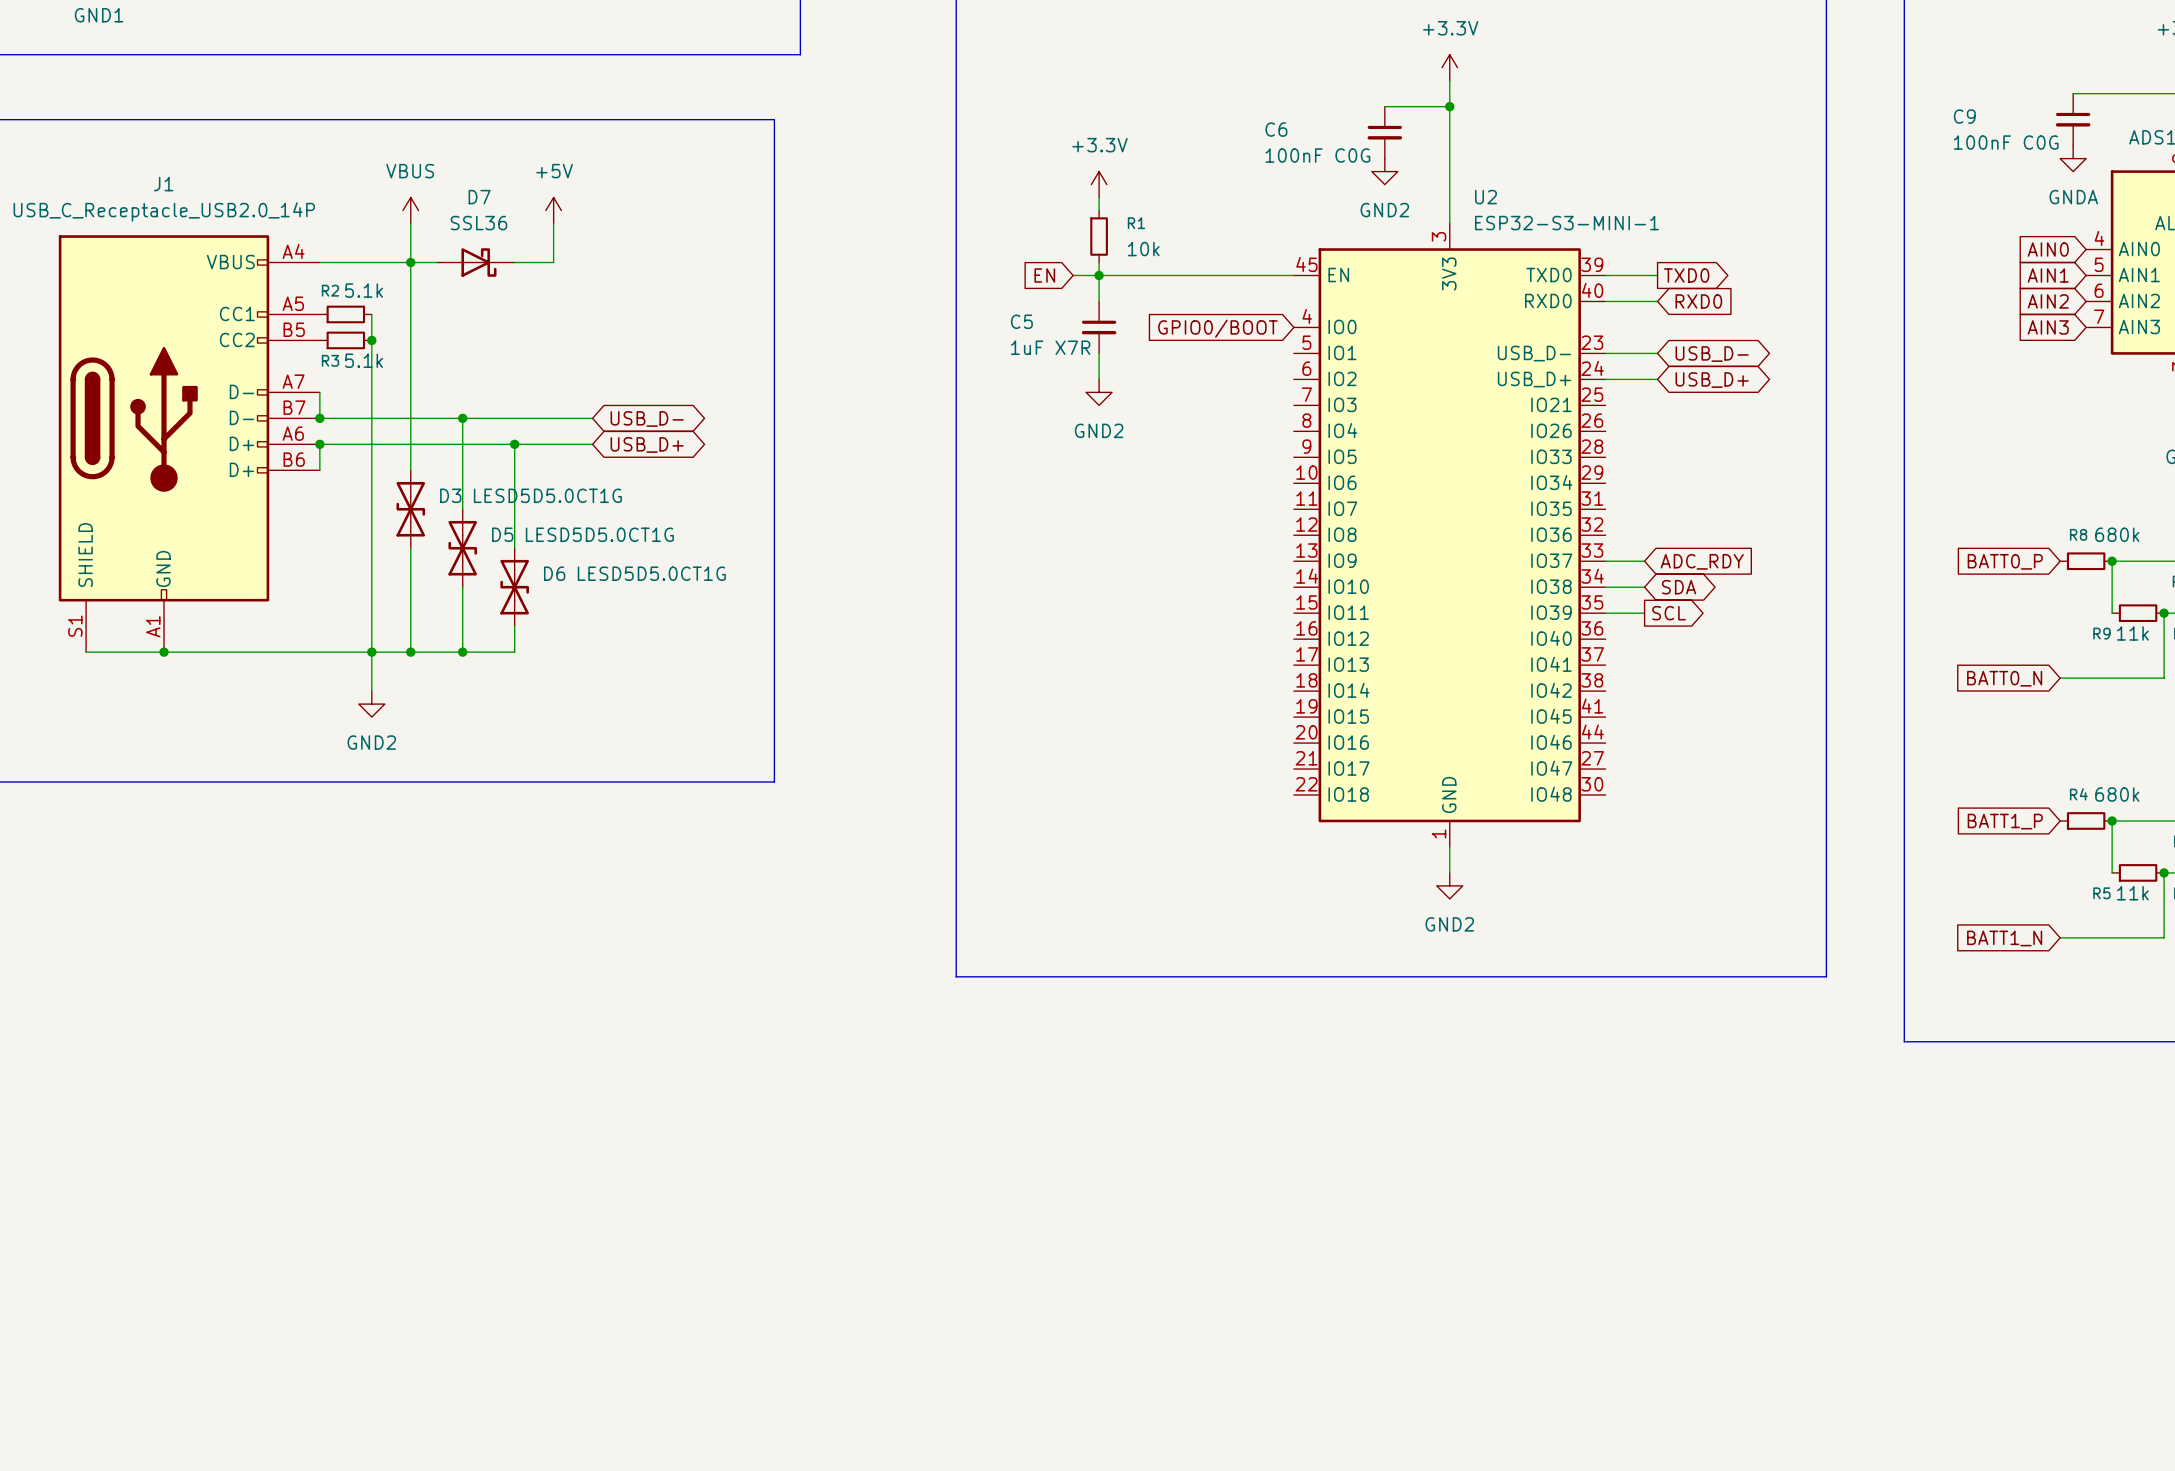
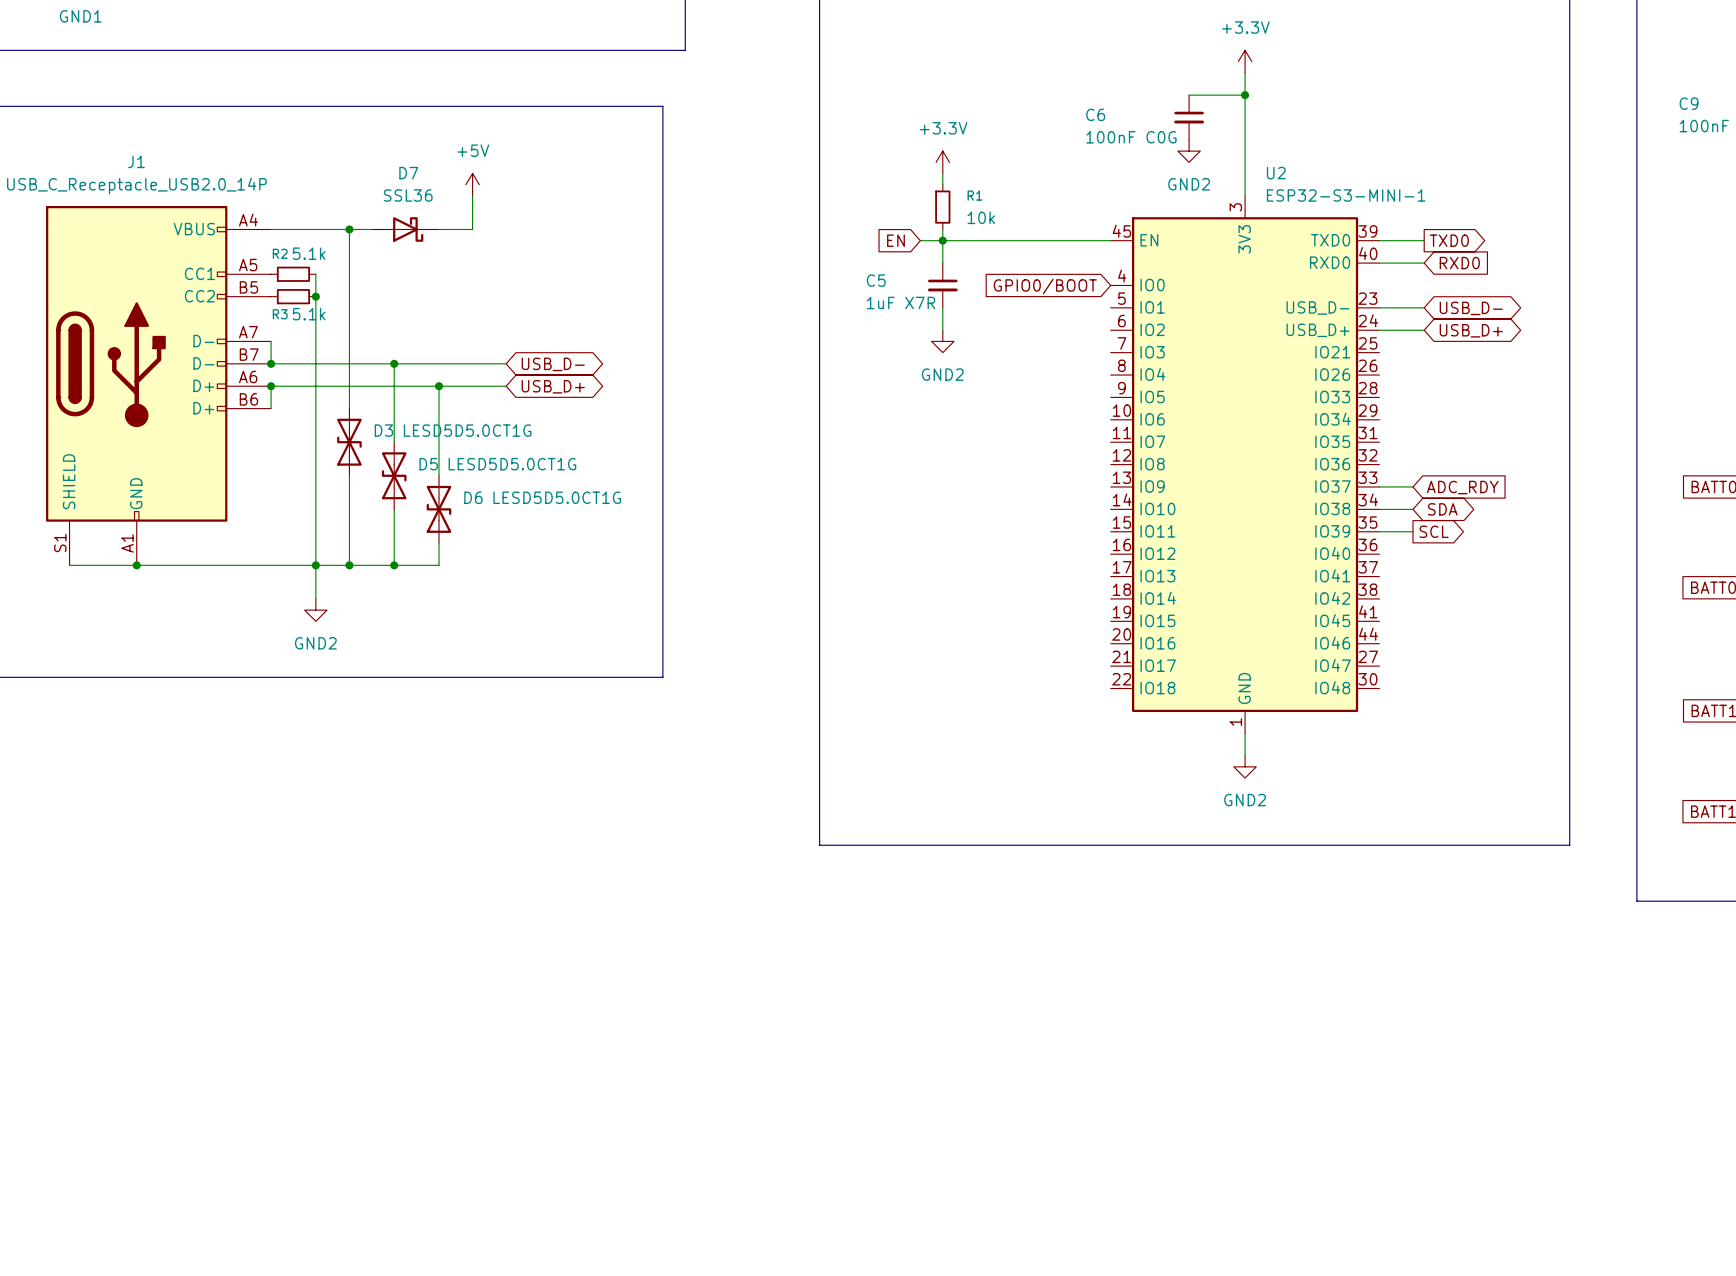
power symbol: VBUS (410, 210) -> none
wire: (410, 223) (410, 262) -> none

